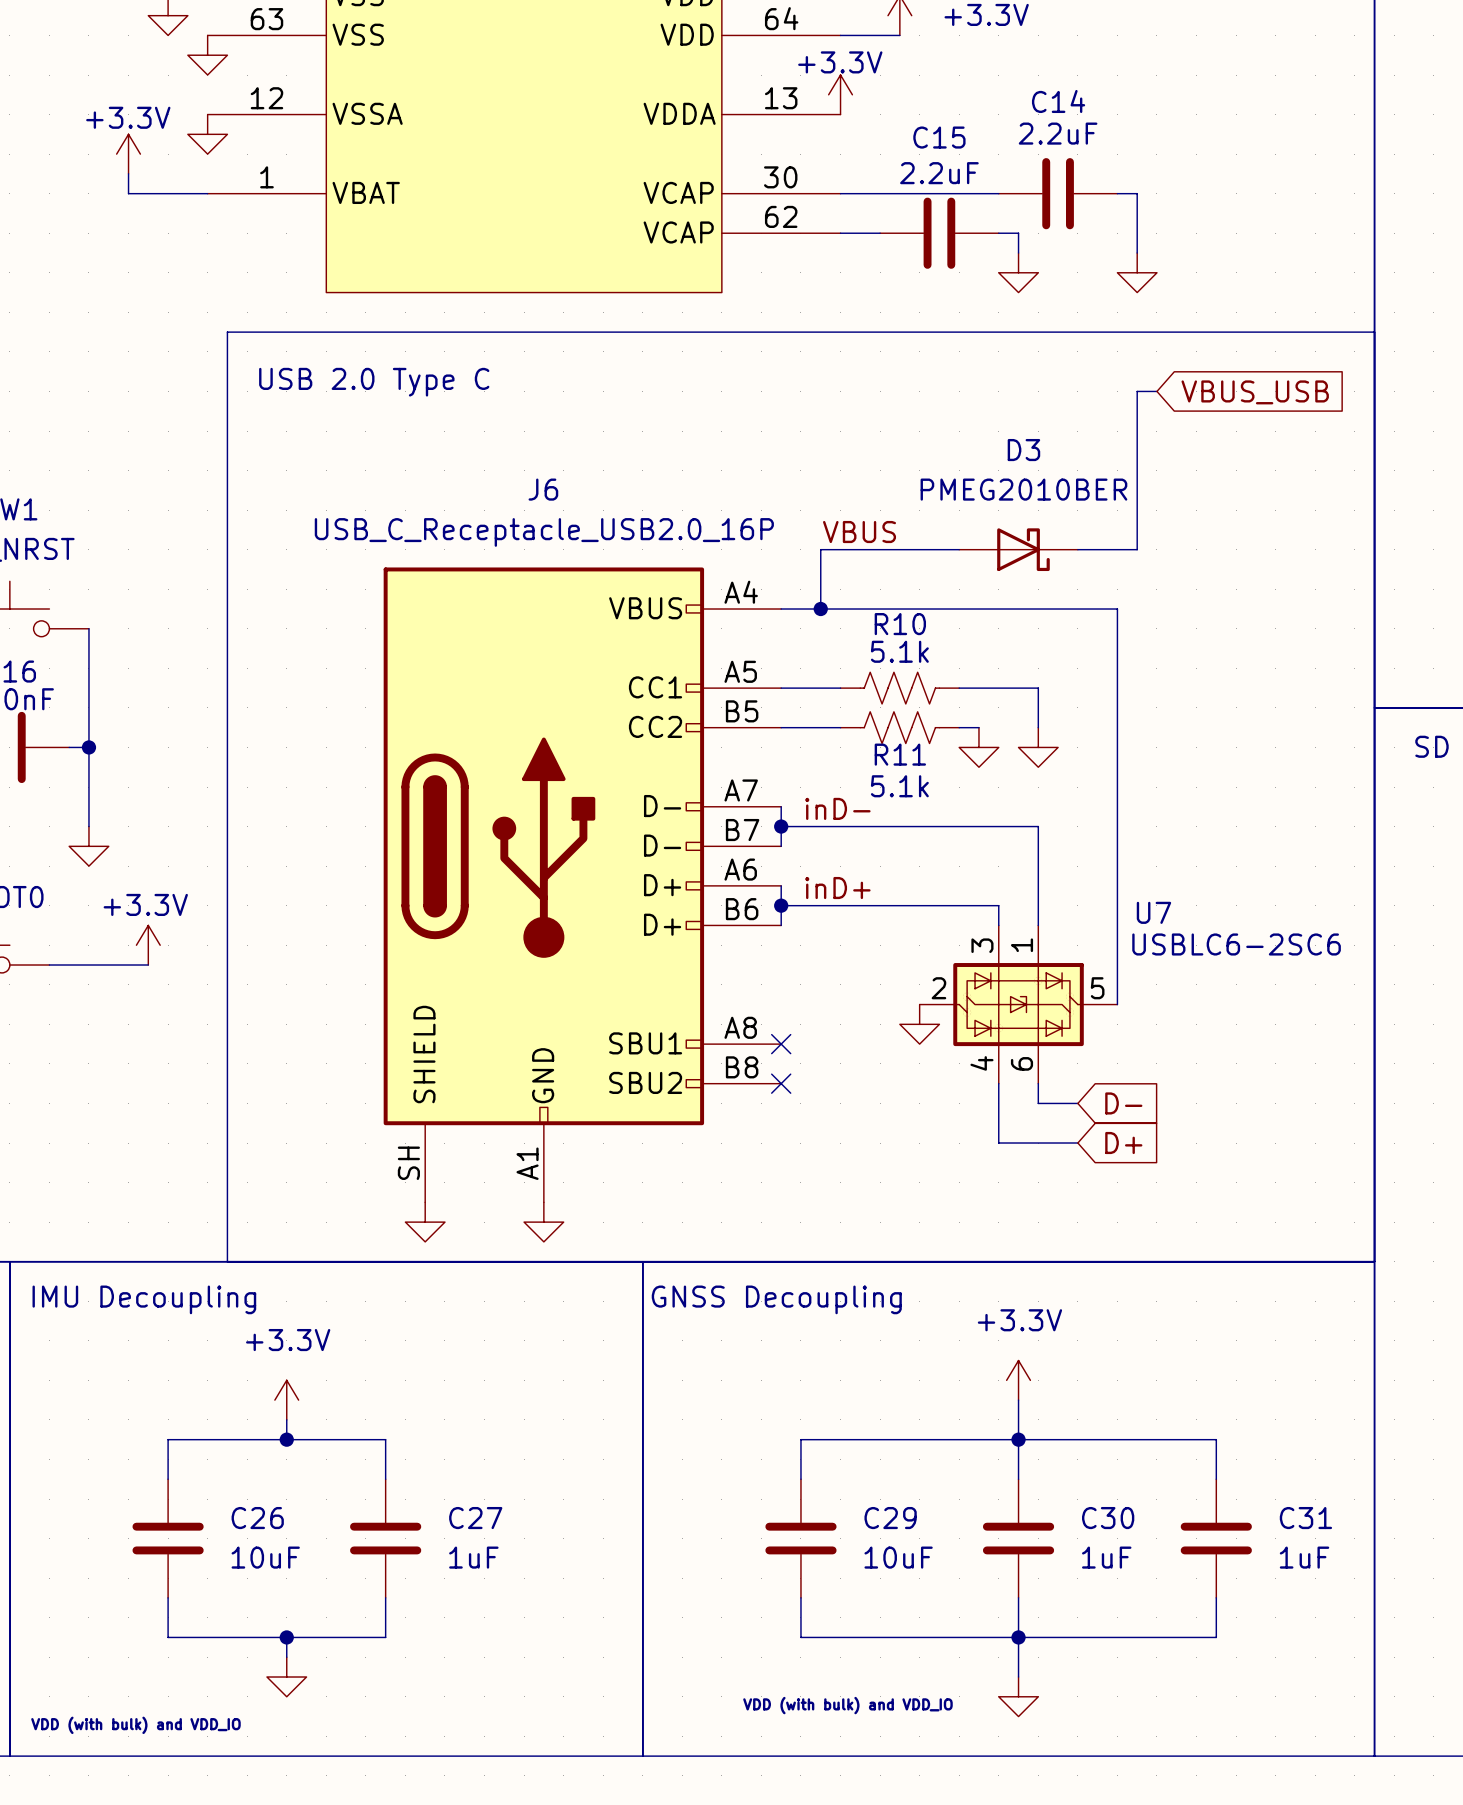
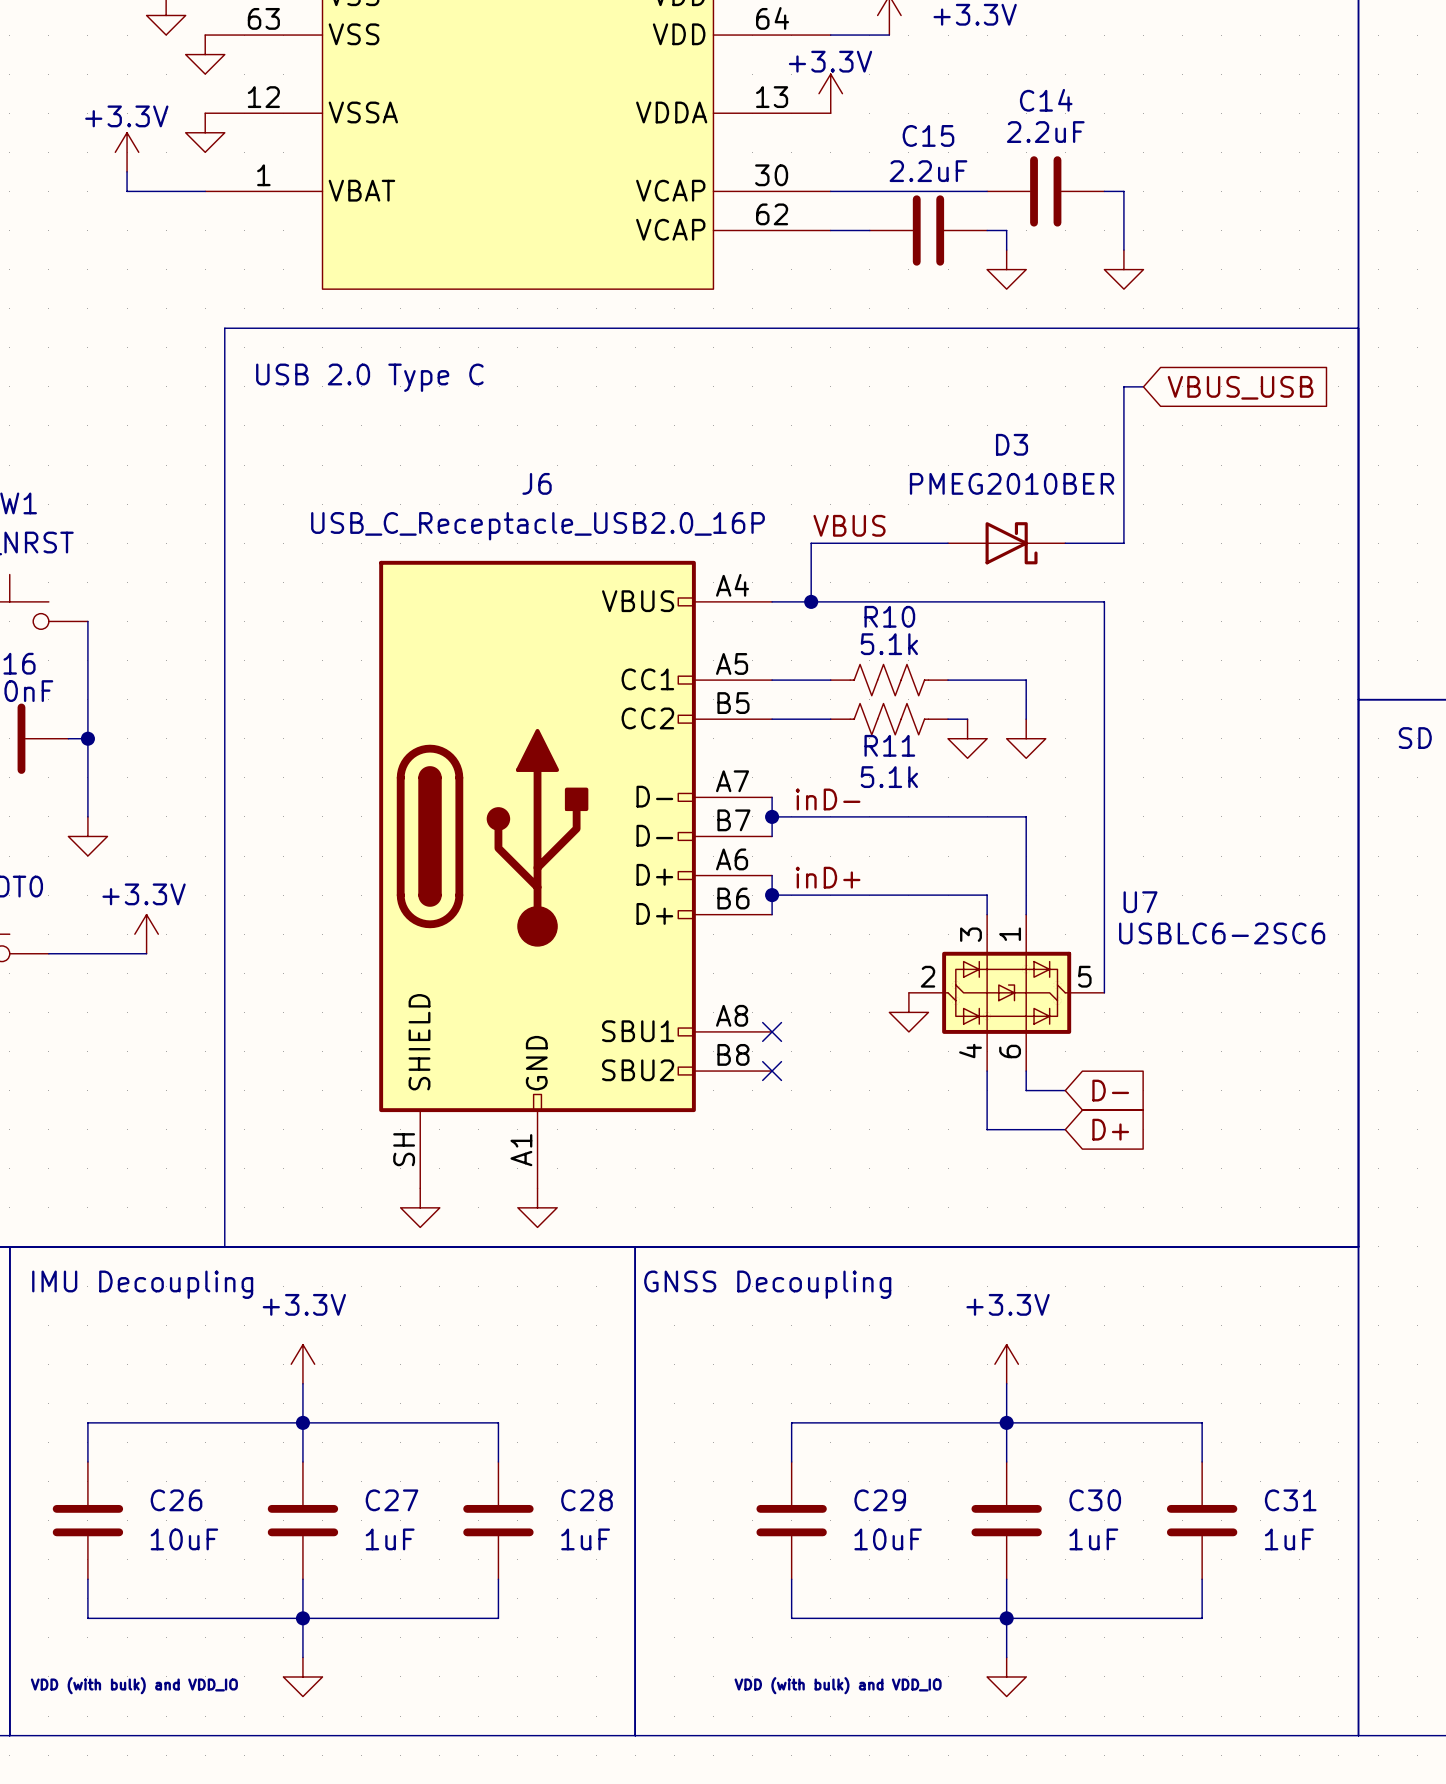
power symbol position: +3.3V (286, 1400) -> +3.3V (302, 1364)
wire: none -> (302, 1383) (302, 1461)
wire: (286, 1419) (286, 1439) -> none
wire: (168, 1439) (168, 1479) -> (166, 1422) (87, 1422) (87, 1461)
junction position: (286, 1439) -> (302, 1422)
wire: (385, 1439) (385, 1479) -> (381, 1422) (498, 1422) (498, 1461)
C26 position: (168, 1538) -> (87, 1520)
C27 position: (385, 1538) -> (302, 1520)
C28: none -> 1uF (498, 1520)
wire: (168, 1597) (168, 1637) -> (87, 1579) (87, 1618) (166, 1618)
wire: none -> (302, 1579) (302, 1657)
wire: (385, 1597) (385, 1637) -> (498, 1579) (498, 1618) (381, 1618)
wire: (286, 1637) (286, 1657) -> none
junction position: (286, 1637) -> (302, 1618)
power symbol position: (286, 1677) -> (302, 1676)
text position: VDD (with bulk) and VDD_IO (135, 1725) -> VDD (with bulk) and VDD_IO (134, 1685)

